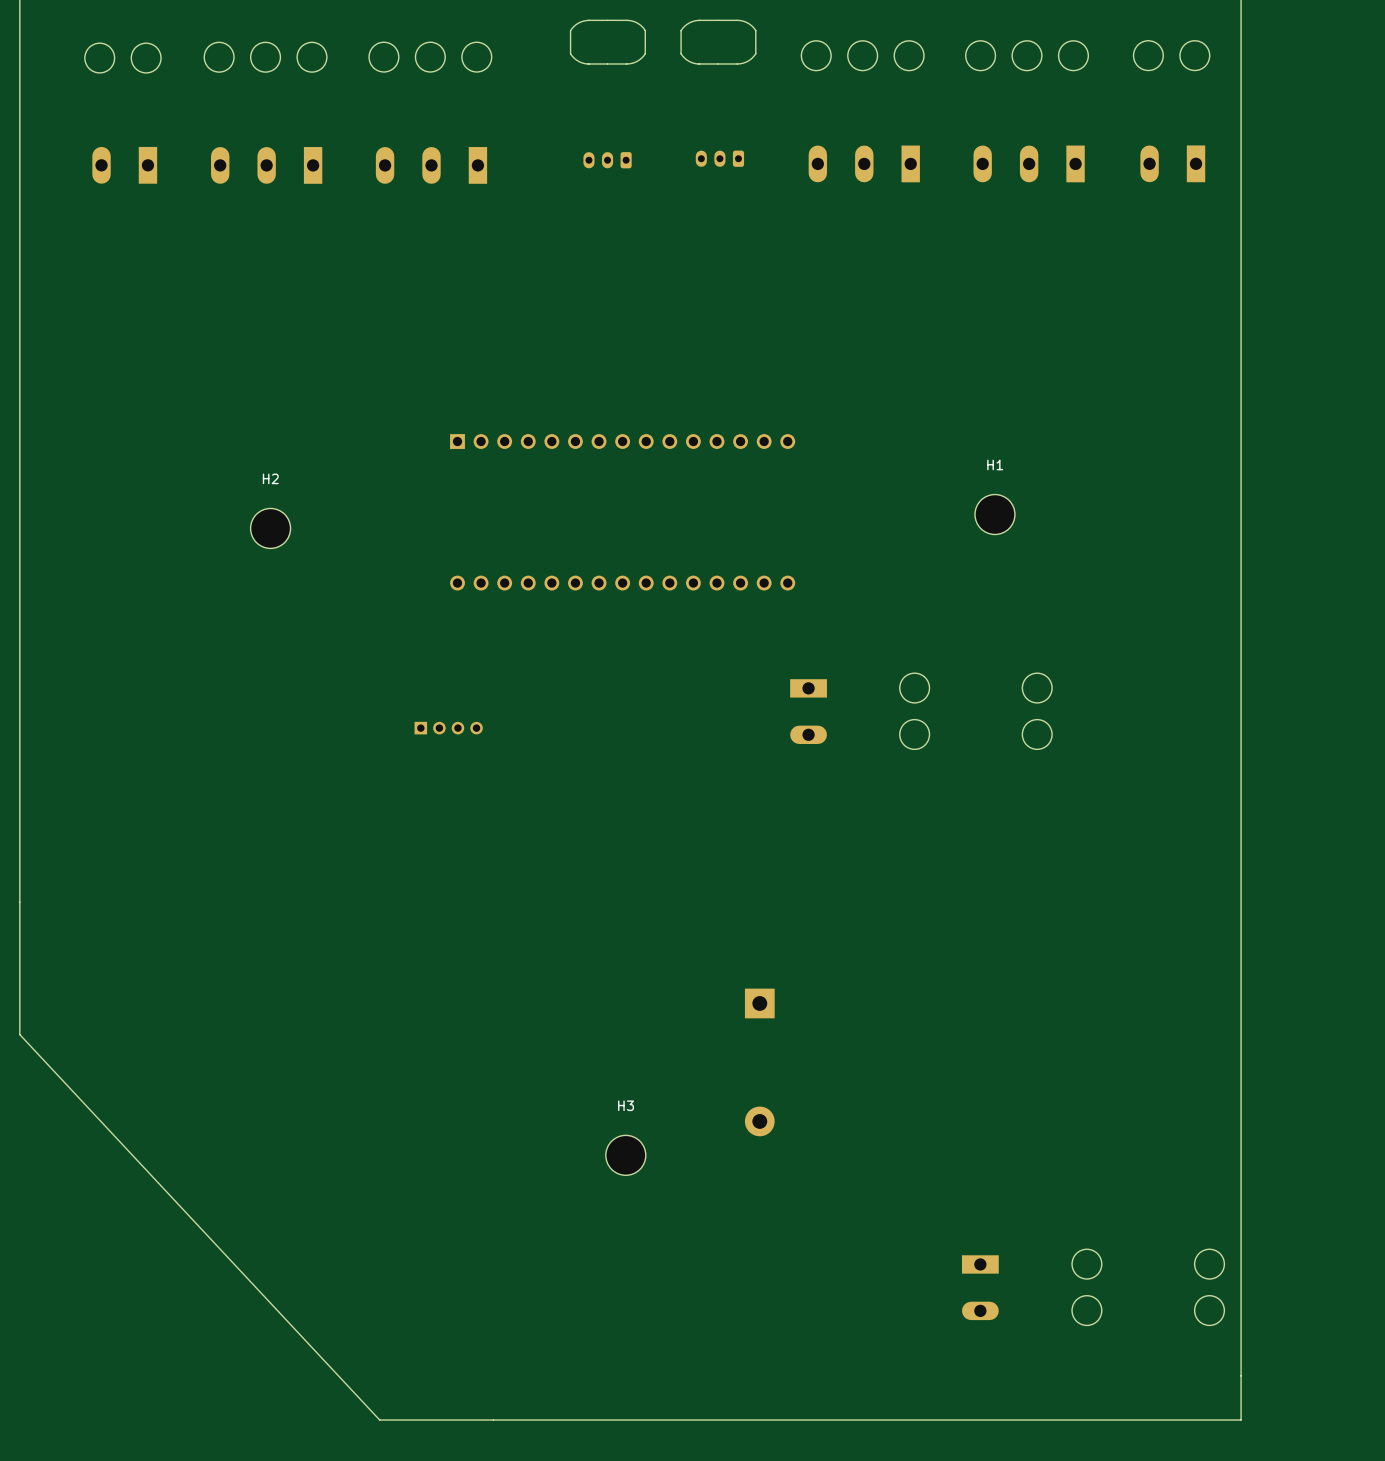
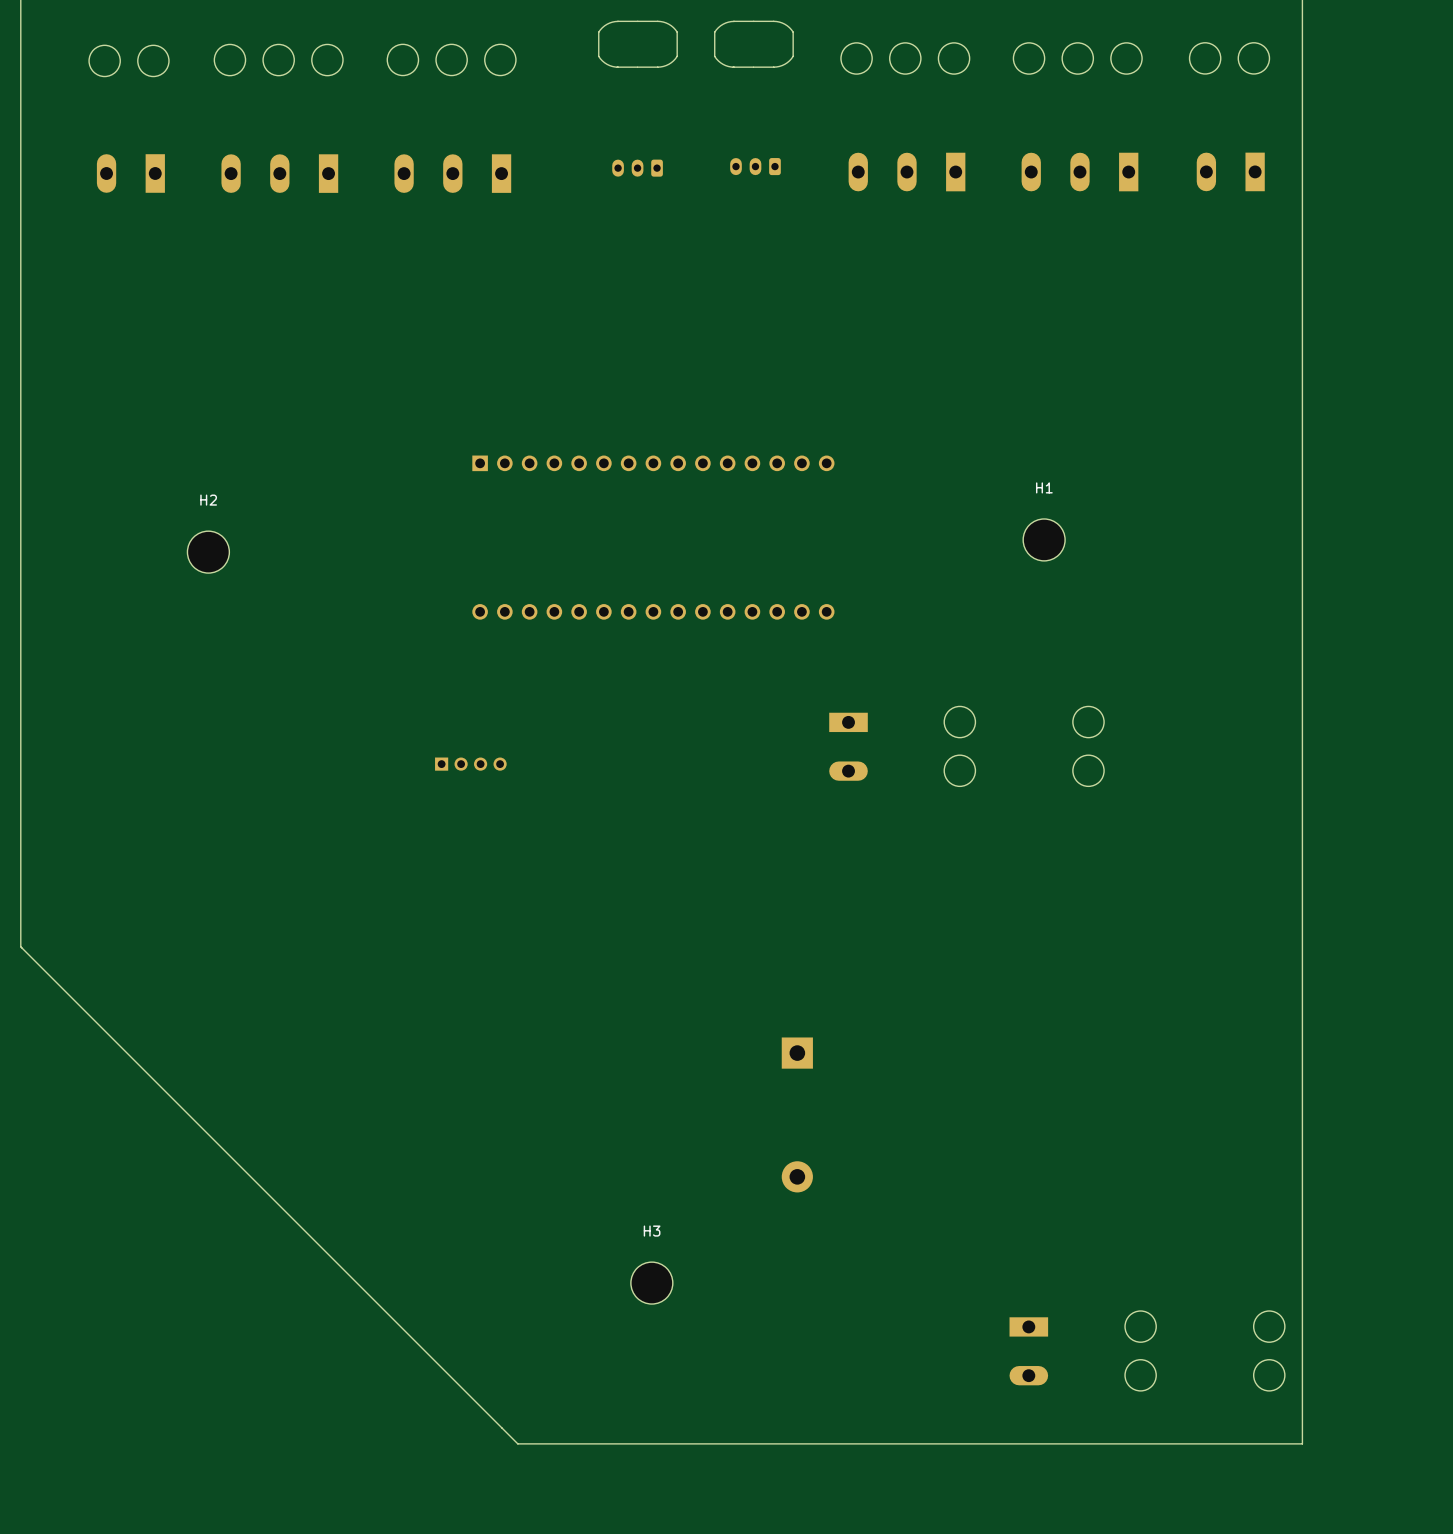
H2 position: (270, 528) -> (208, 552)
board edge: (19, 902) (19, 1034) (379, 1420) (1241, 1420) (1241, 1375) -> (20, 946) (517, 1443) (1302, 1443)
H3 position: (625, 1155) -> (651, 1283)

